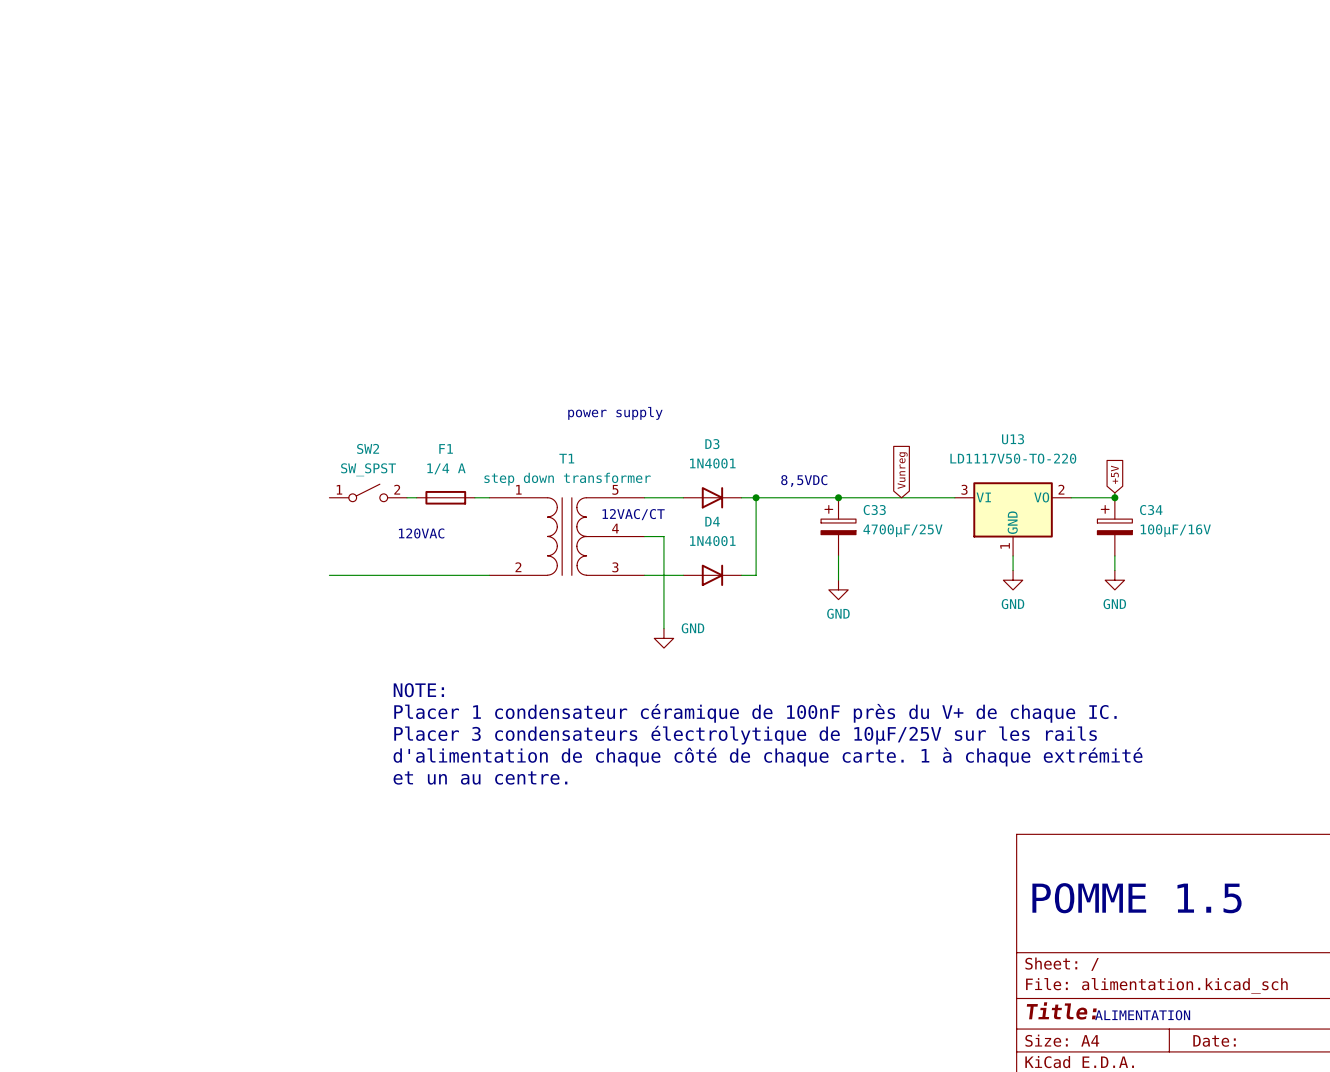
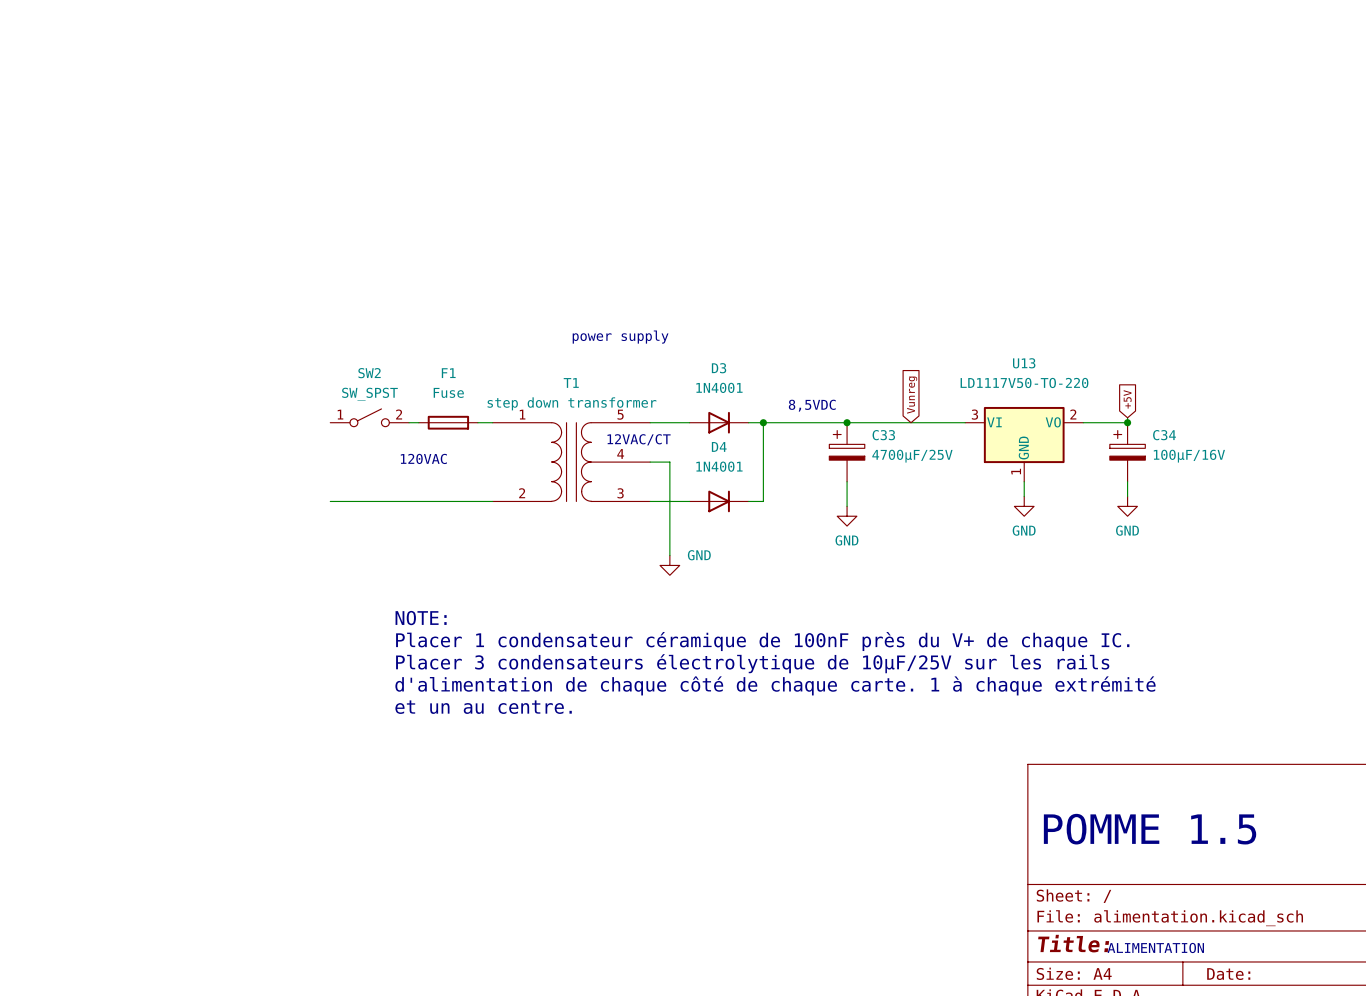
F1 value: 1/4 A (446, 468) -> Fuse (448, 392)

